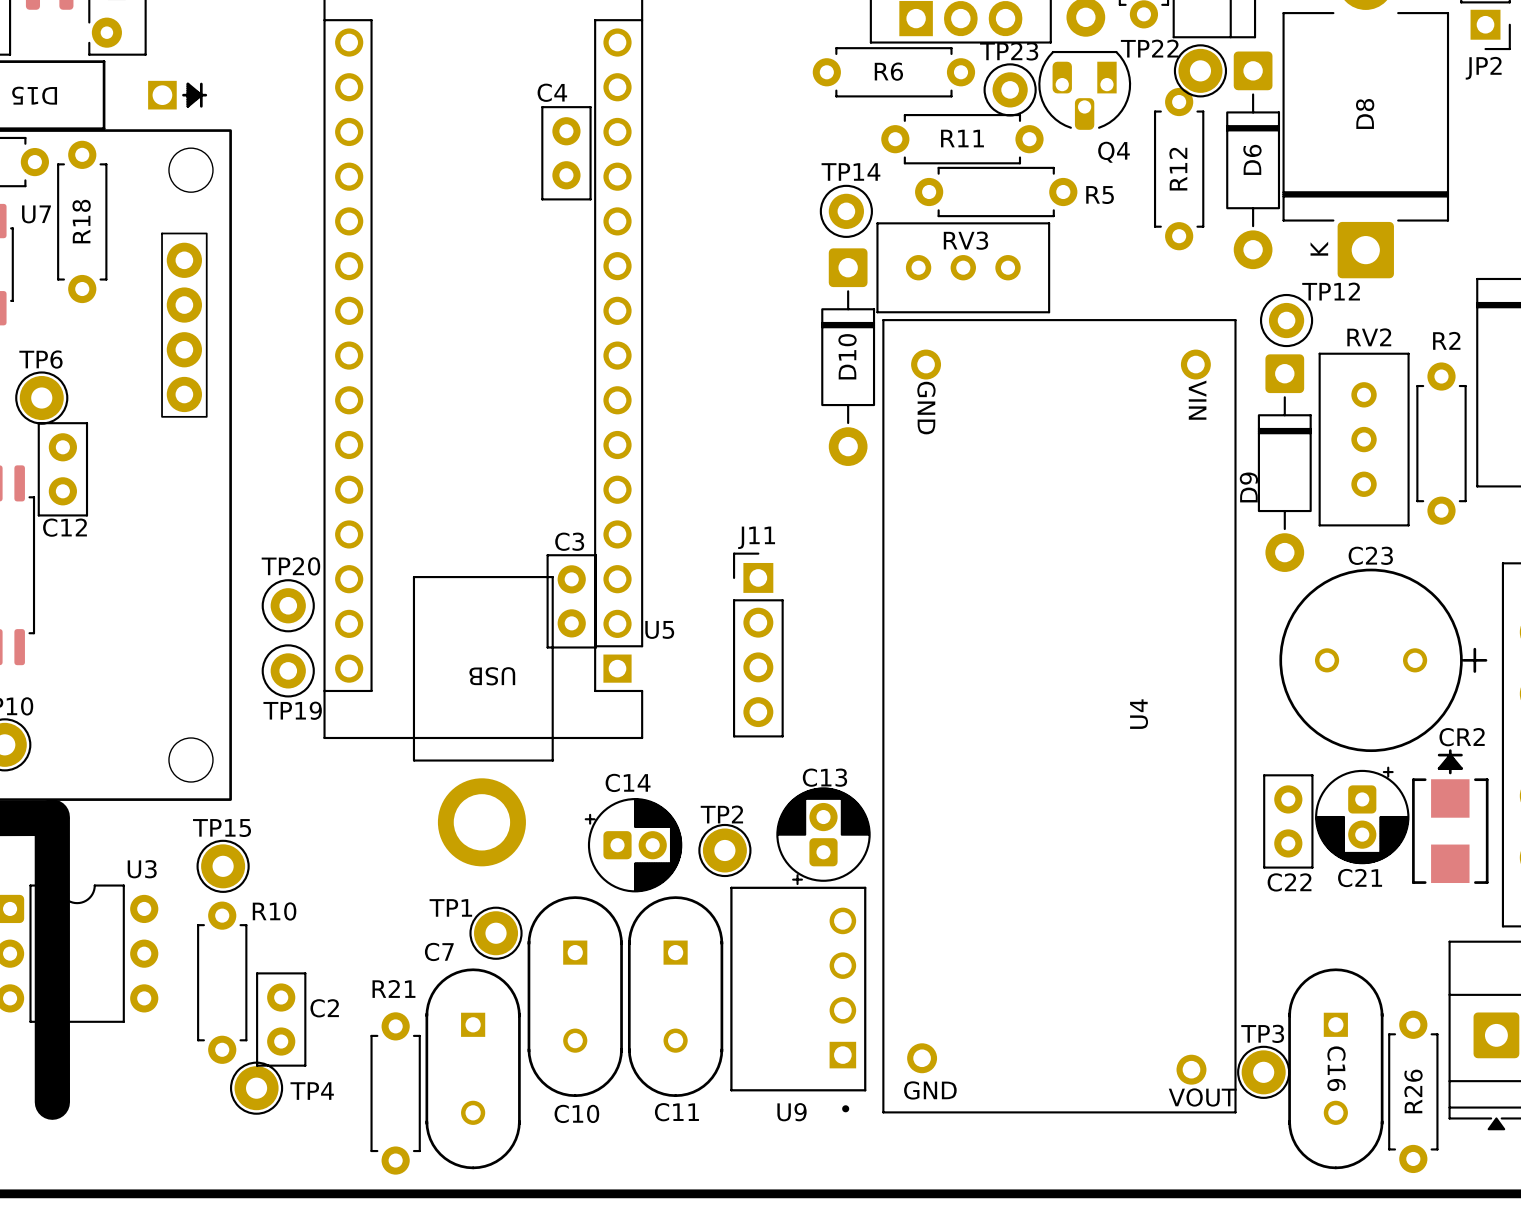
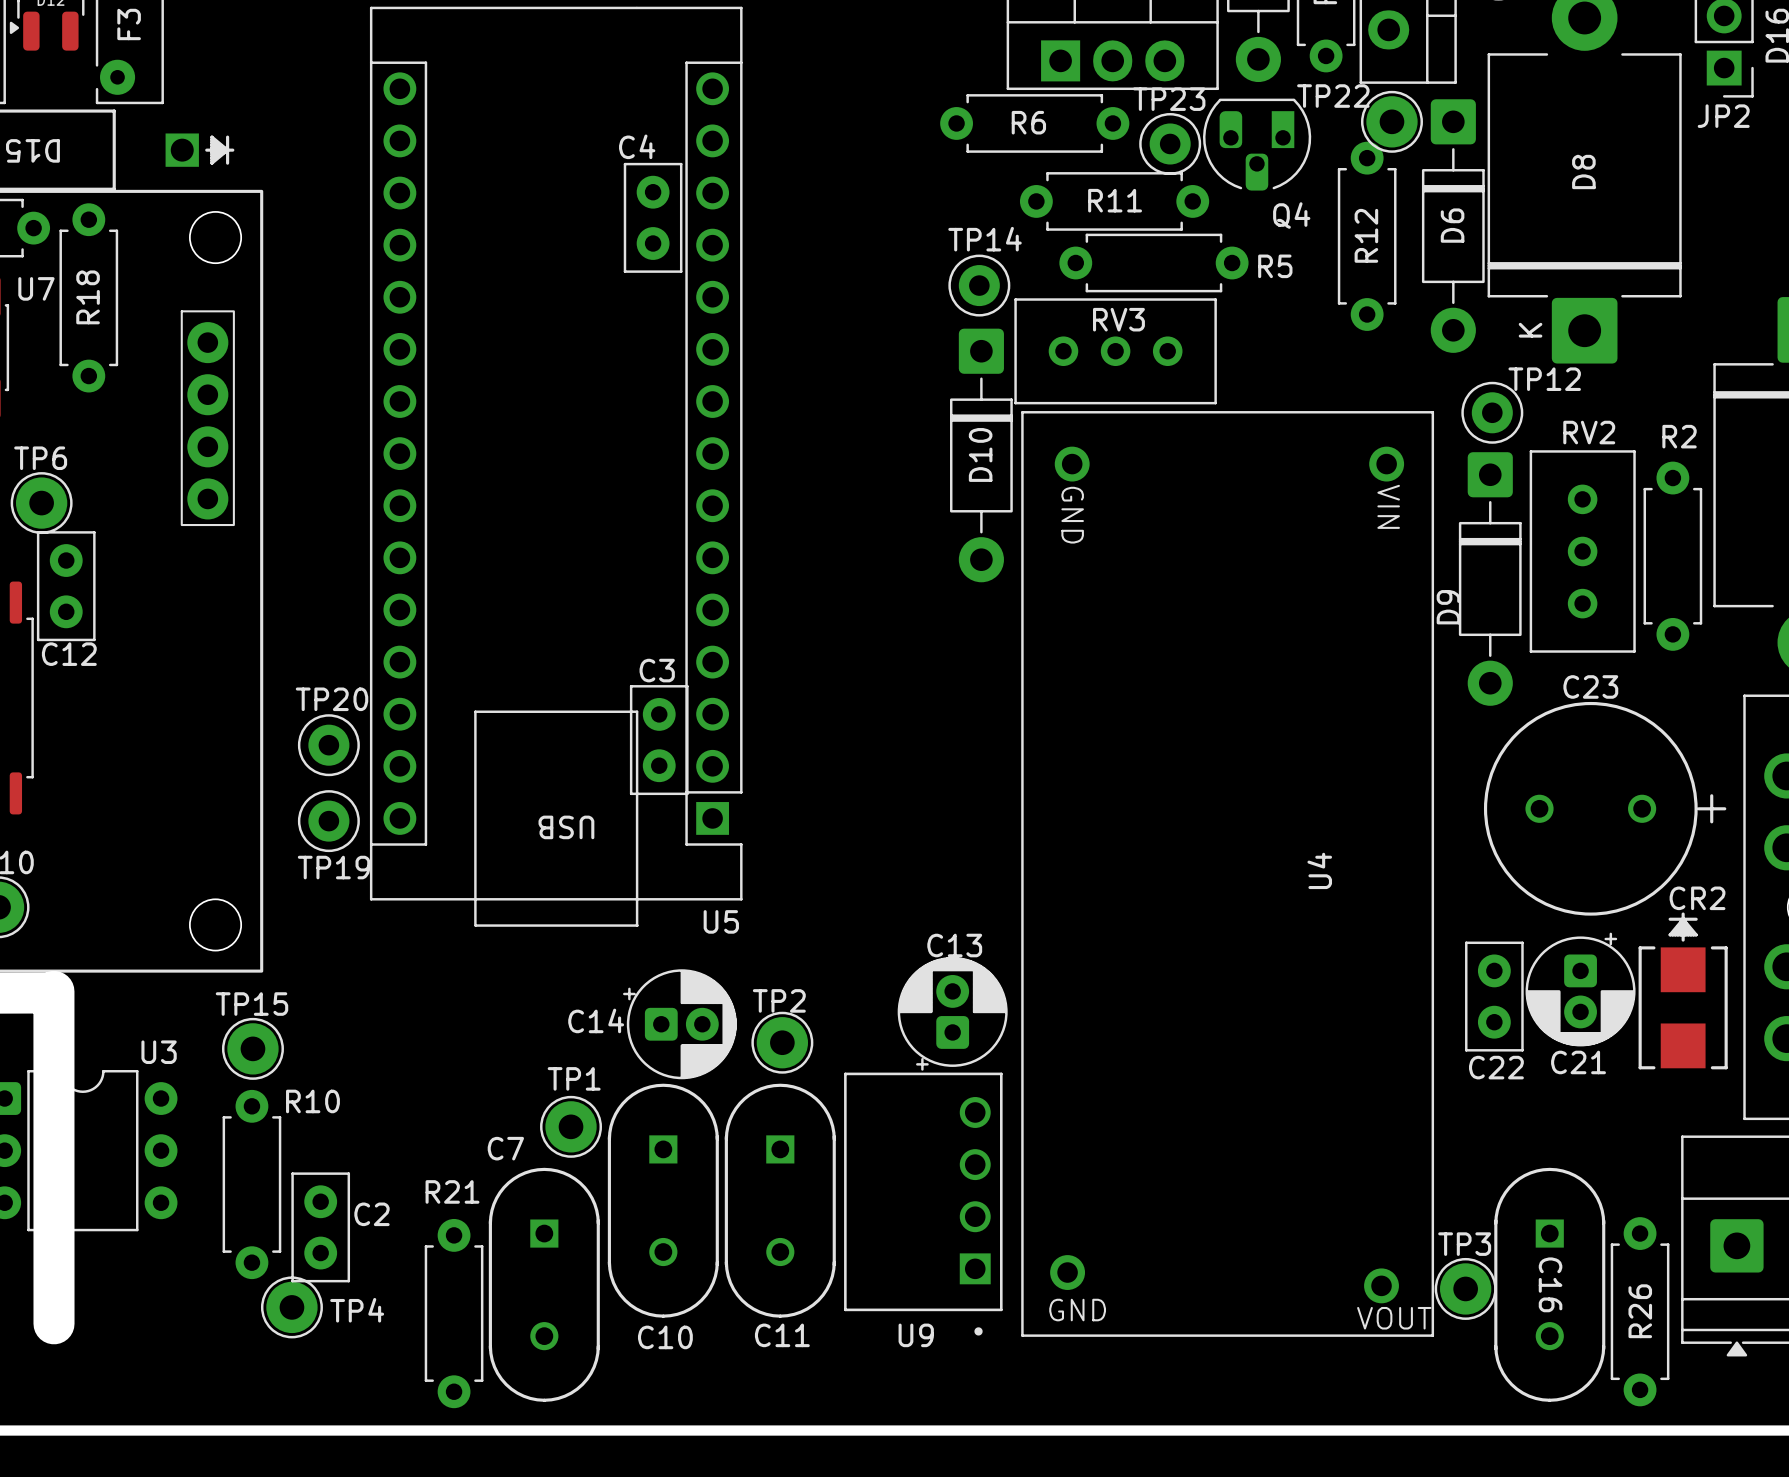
U5 name position: U5 (659, 629) -> U5 (721, 921)
J11: (758, 645) -> none
C14 name position: C14 (628, 782) -> C14 (596, 1020)
part: (481, 822) -> none
C14 position: (633, 845) -> (679, 1024)
TP2 position: (724, 850) -> (782, 1042)
TP1 name position: TP1 (450, 907) -> TP1 (574, 1078)

